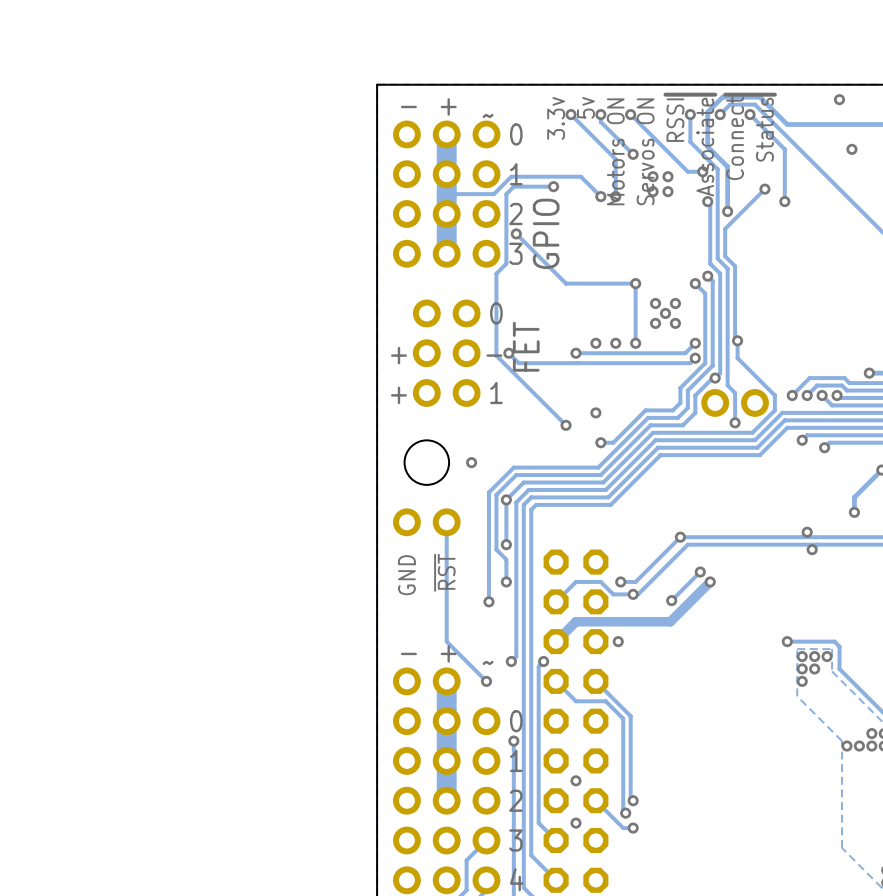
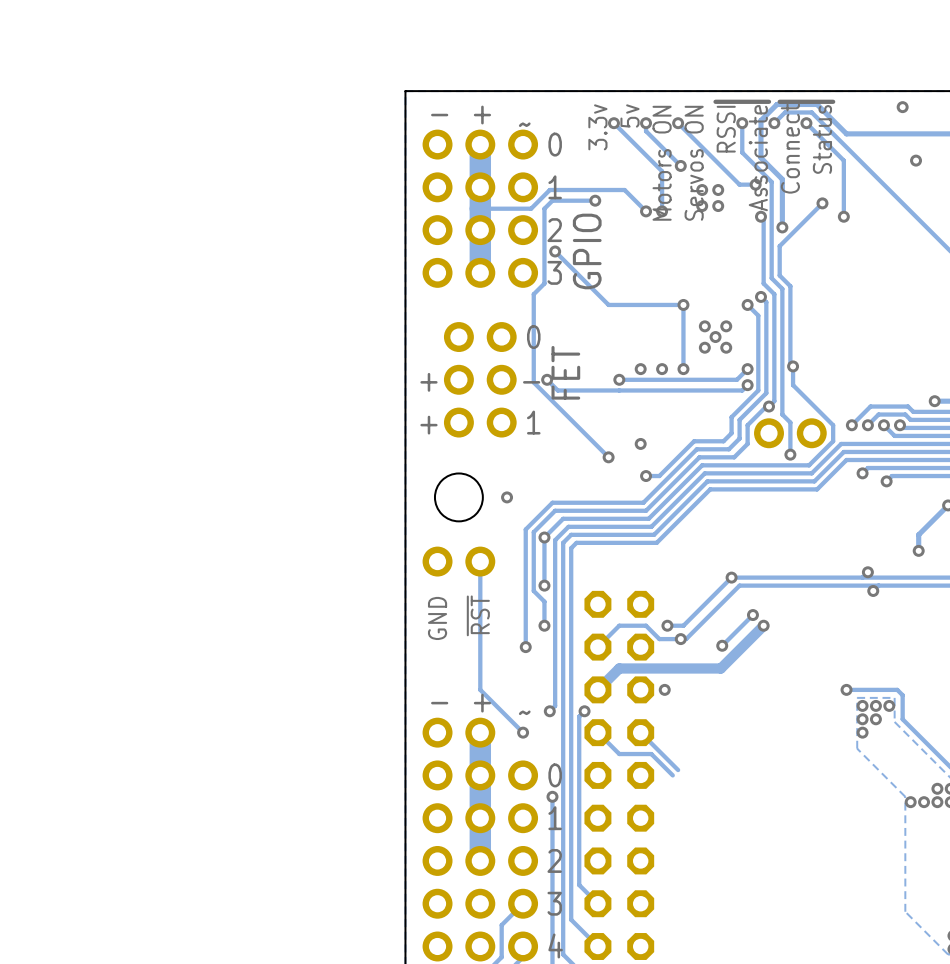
track: (630, 716) (630, 798) (633, 800) -> none
track: (623, 718) (623, 810) (625, 813) -> (670, 772) (672, 775)
via: (575, 780) -> none
track: (595, 800) (623, 828) (633, 828) -> none
via: (633, 800) -> none
via: (625, 813) -> none
via: (575, 823) -> none
via: (633, 828) -> none

